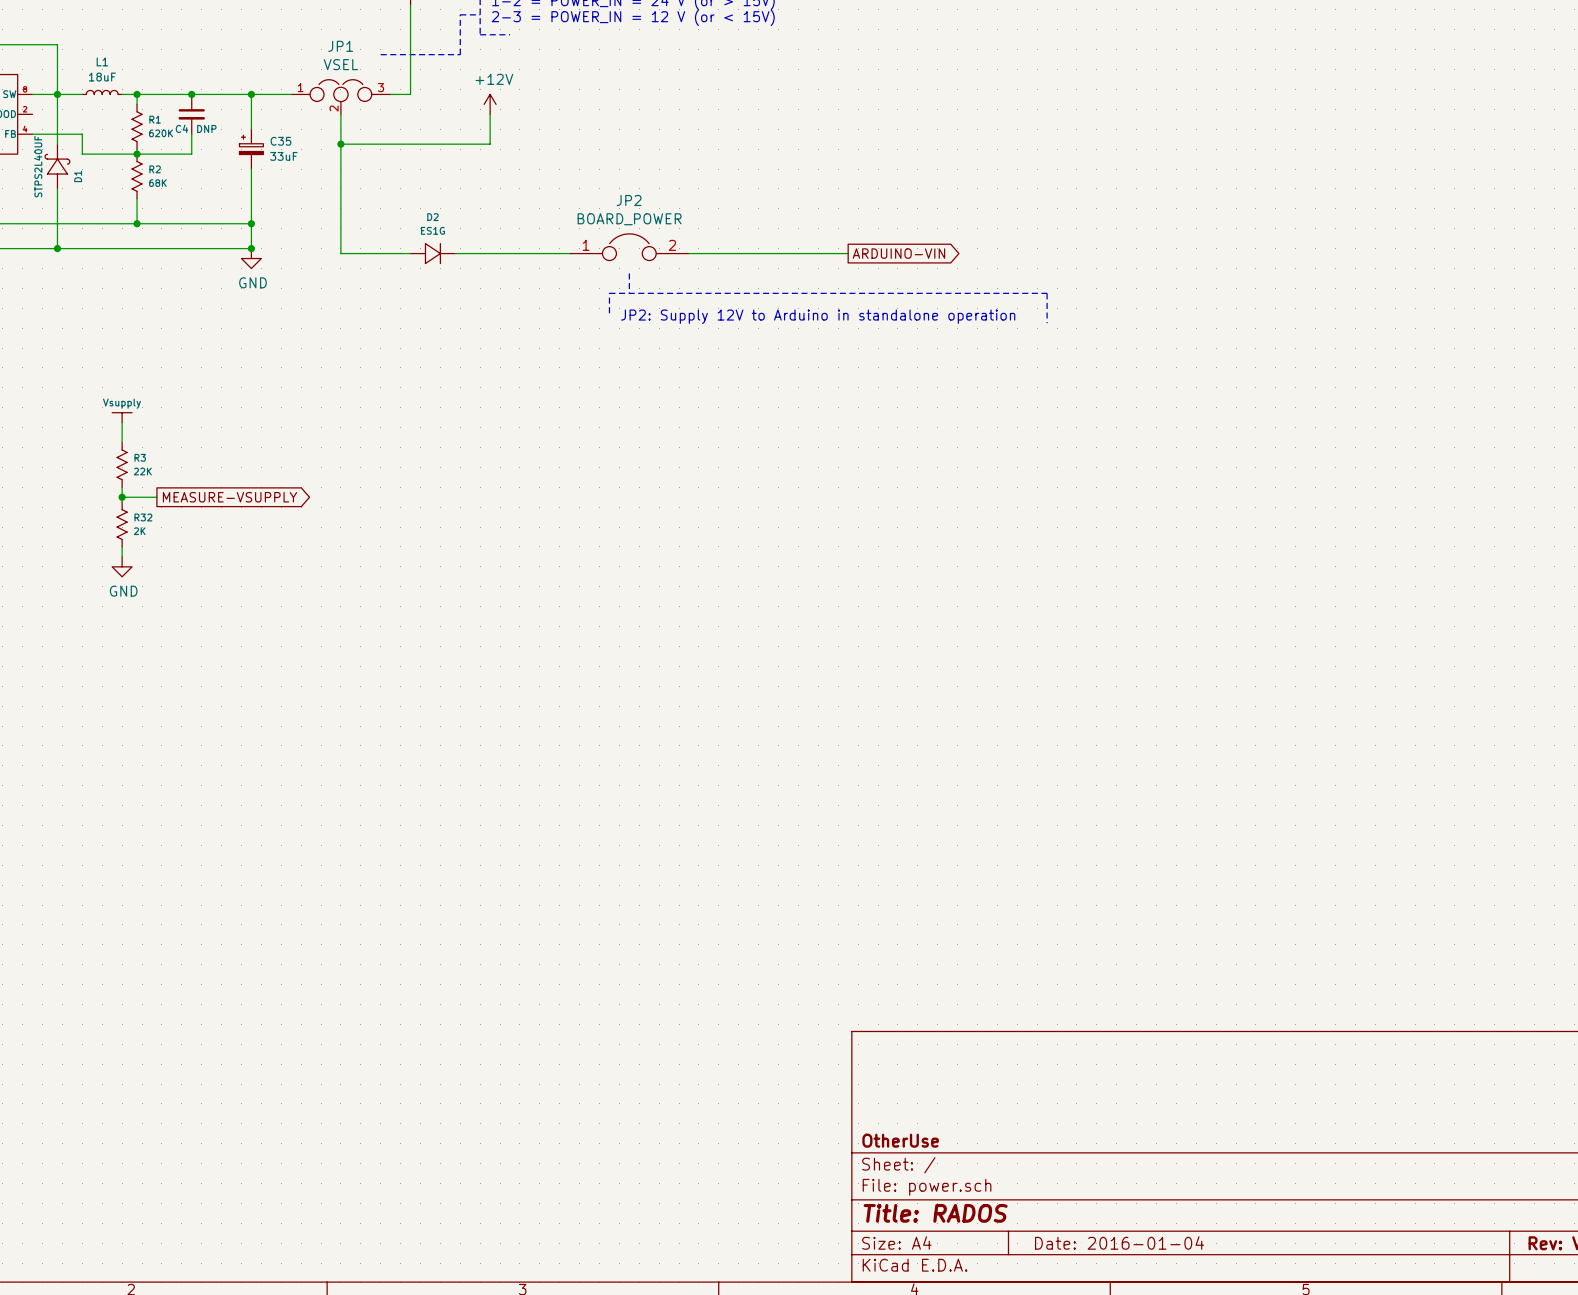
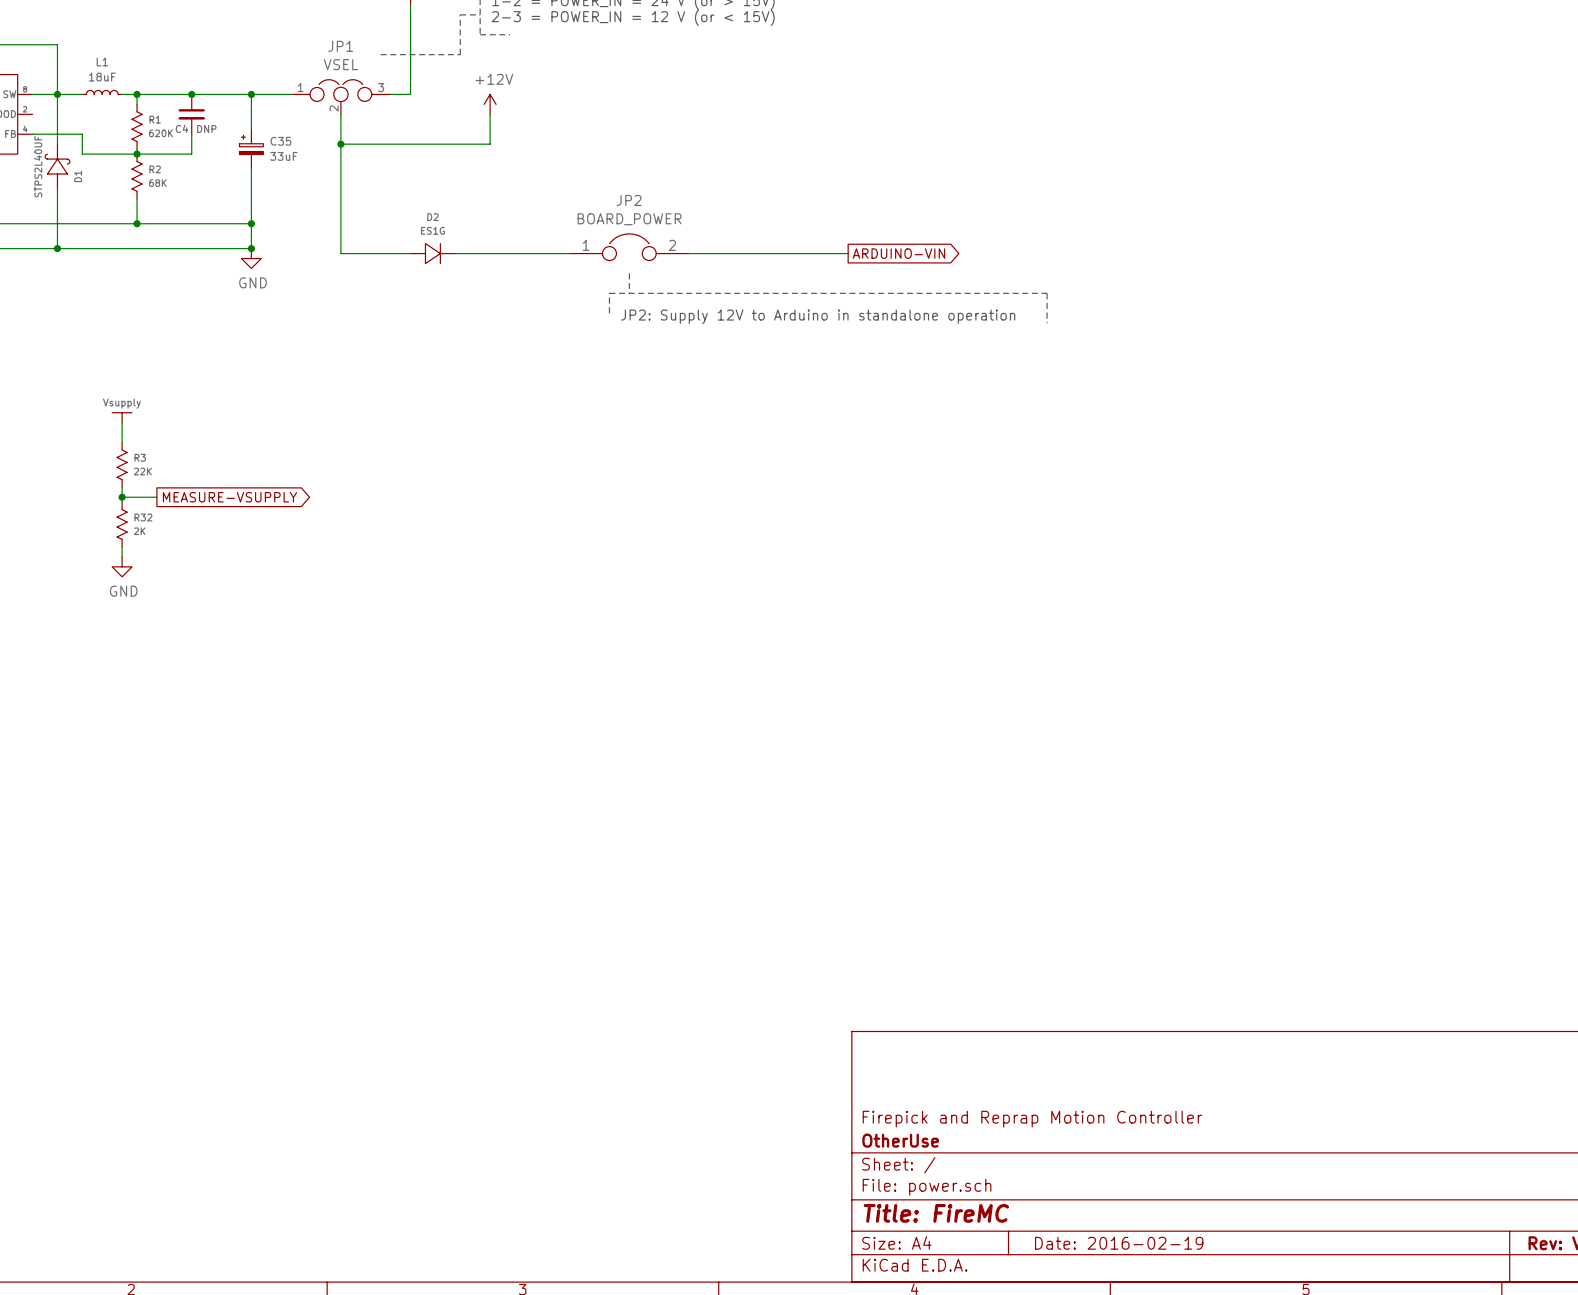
title block: none -> Firepick and Reprap Motion Controller (1032, 1119)
title block: Title: RADOS (935, 1213) -> Title: FireMC (936, 1213)
title block: Date: 2016-01-04 (1119, 1243) -> Date: 2016-02-19 (1119, 1243)

